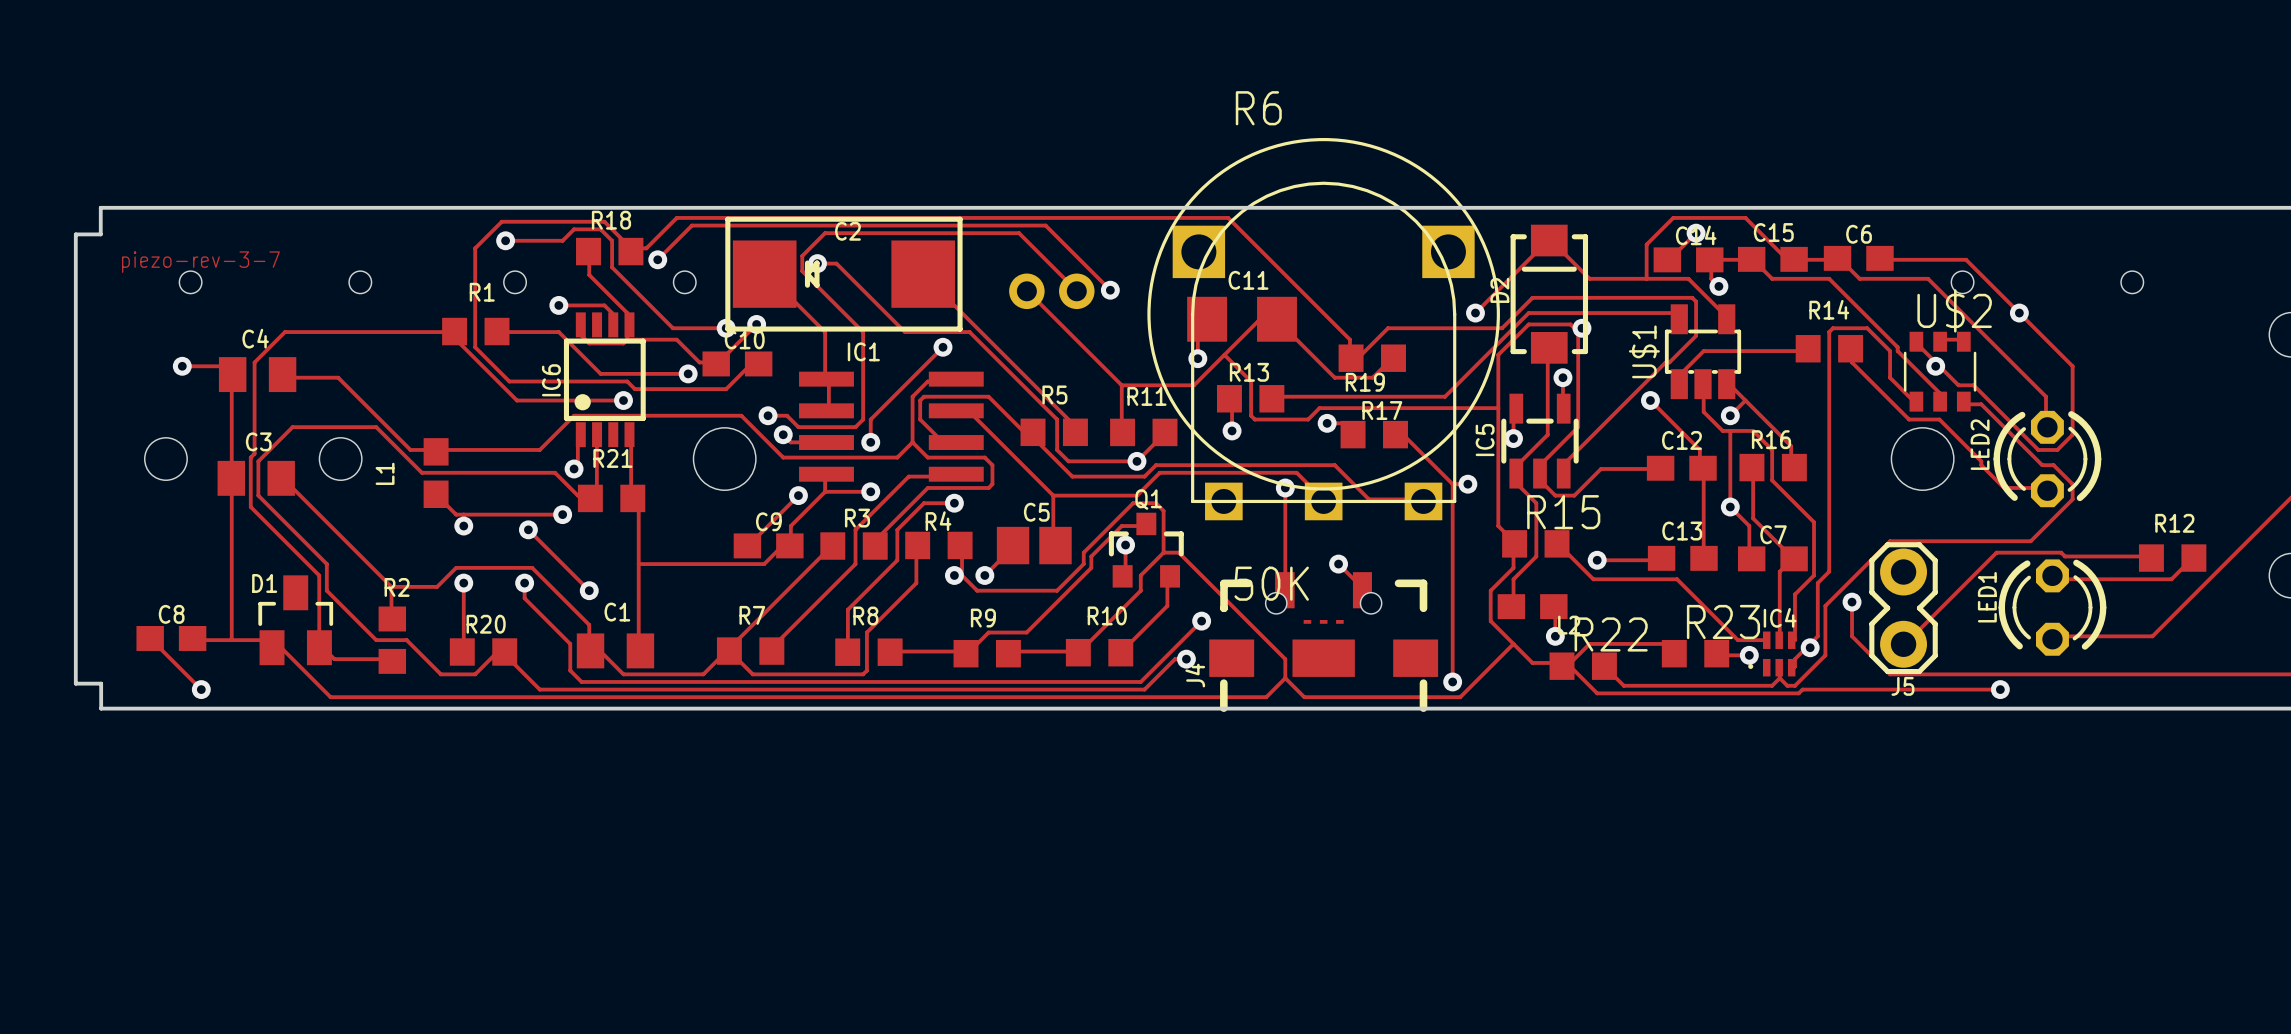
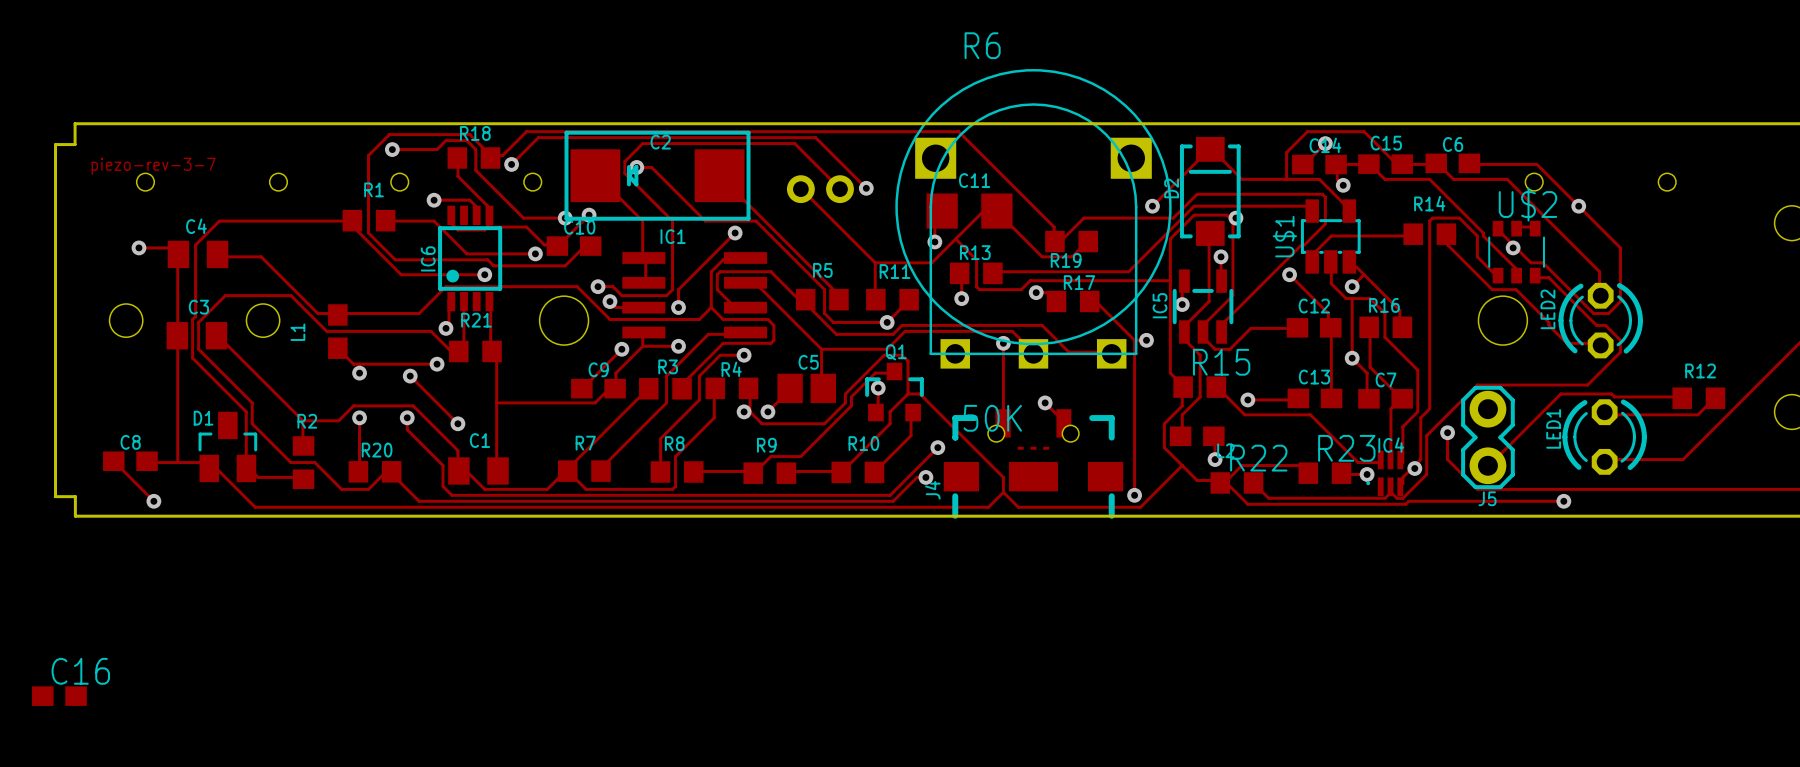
IC4 footprint: [1748, 631, 1796, 677] -> [1366, 450, 1404, 497]
C16: none -> (59, 696)

